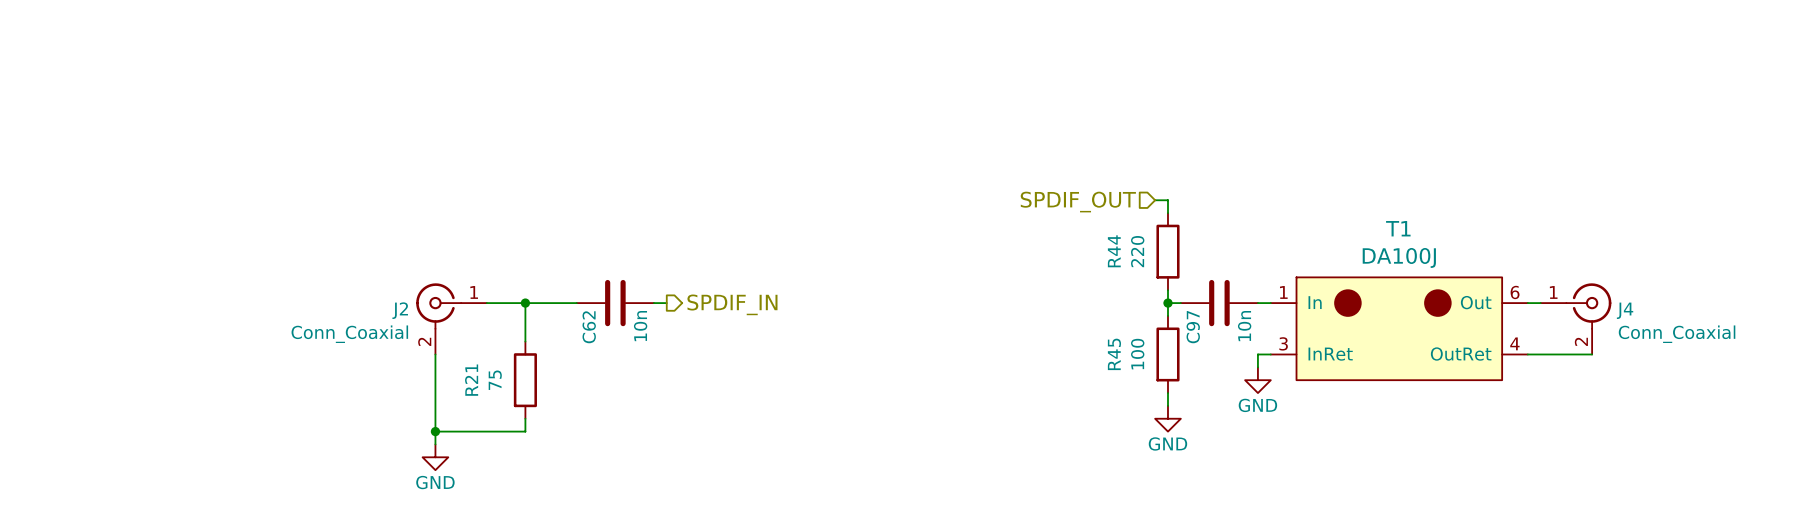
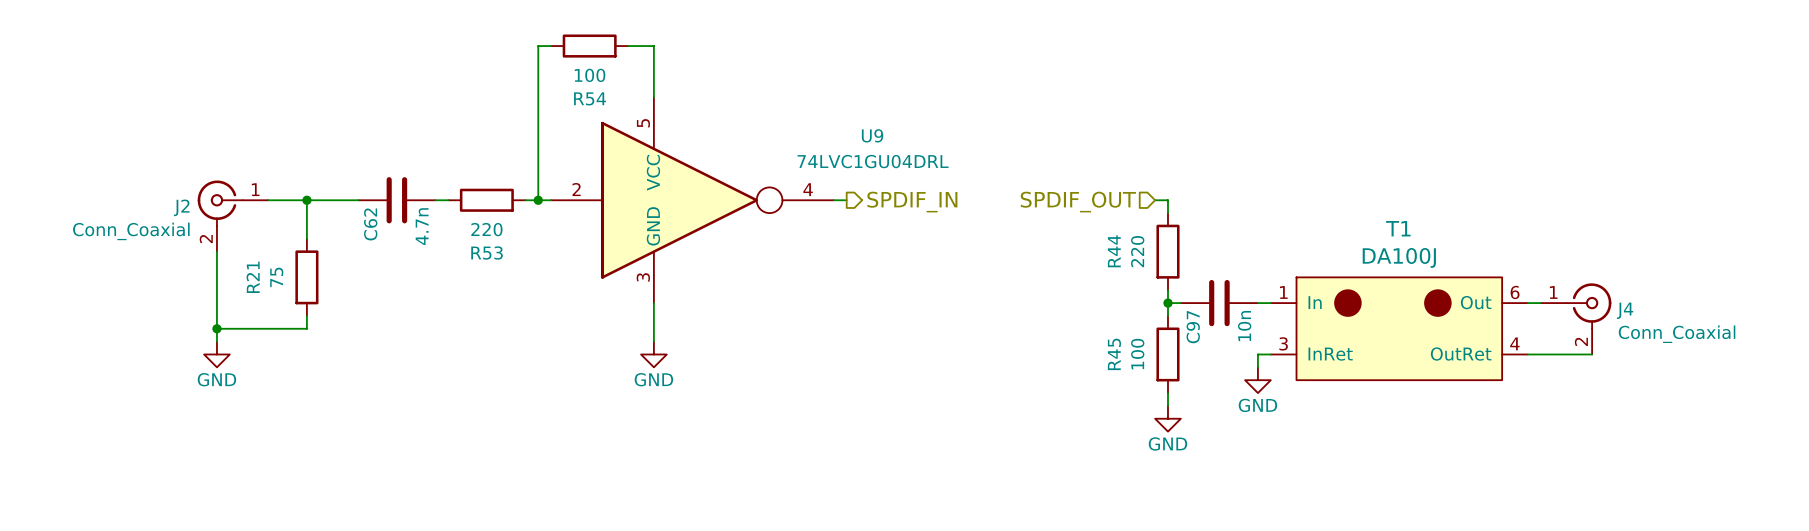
wire: none -> (551, 46) (538, 46) (538, 200)
R54: none -> 100 (589, 46)
wire: none -> (628, 46) (653, 46) (653, 97)
junction: none -> (306, 200)
wire: none -> (435, 200) (448, 200)
R53: none -> 220 (486, 200)
wire: none -> (525, 200) (551, 200)
junction: none -> (538, 200)
U9: none -> 74LVC1GU04DRL (692, 200)
wire: none -> (833, 200) (846, 200)
wire: (486, 303) (576, 303) -> (268, 200) (358, 200)
wire: (525, 303) (525, 341) -> (306, 200) (306, 238)
junction: (525, 303) -> none
C62 position: (615, 303) -> (396, 200)
wire: (653, 303) (666, 303) -> (653, 303) (653, 341)
hierarchical label position: SPDIF_IN (732, 304) -> SPDIF_IN (912, 202)
J2 position: (451, 318) -> (233, 216)
C62 value: 10n (640, 326) -> 4.7n (422, 226)
junction: none -> (216, 328)
power symbol: none -> GND (216, 354)
wire: (435, 354) (435, 444) -> (216, 251) (216, 341)
power symbol: none -> GND (653, 354)
R21 position: (525, 380) -> (306, 277)
wire: (525, 418) (525, 431) (435, 431) -> (306, 315) (306, 328) (216, 328)
junction: (435, 431) -> none
power symbol: GND (435, 457) -> none

